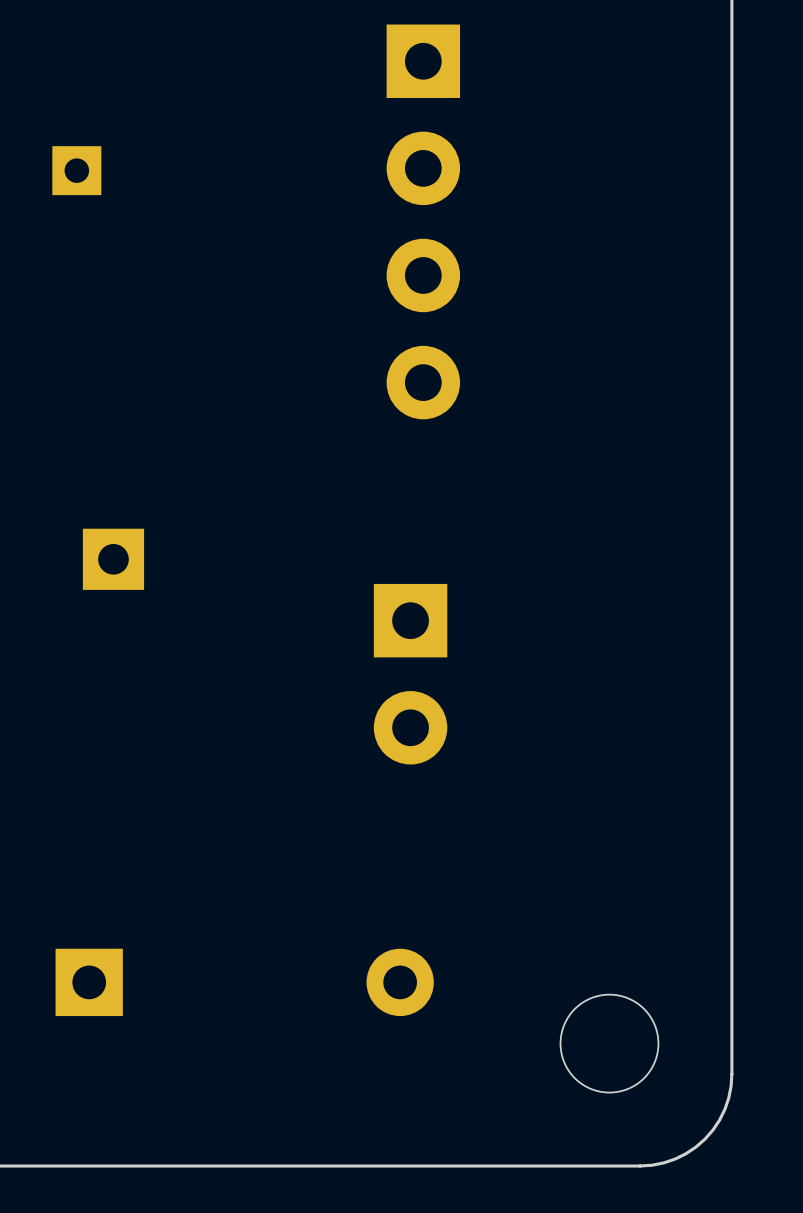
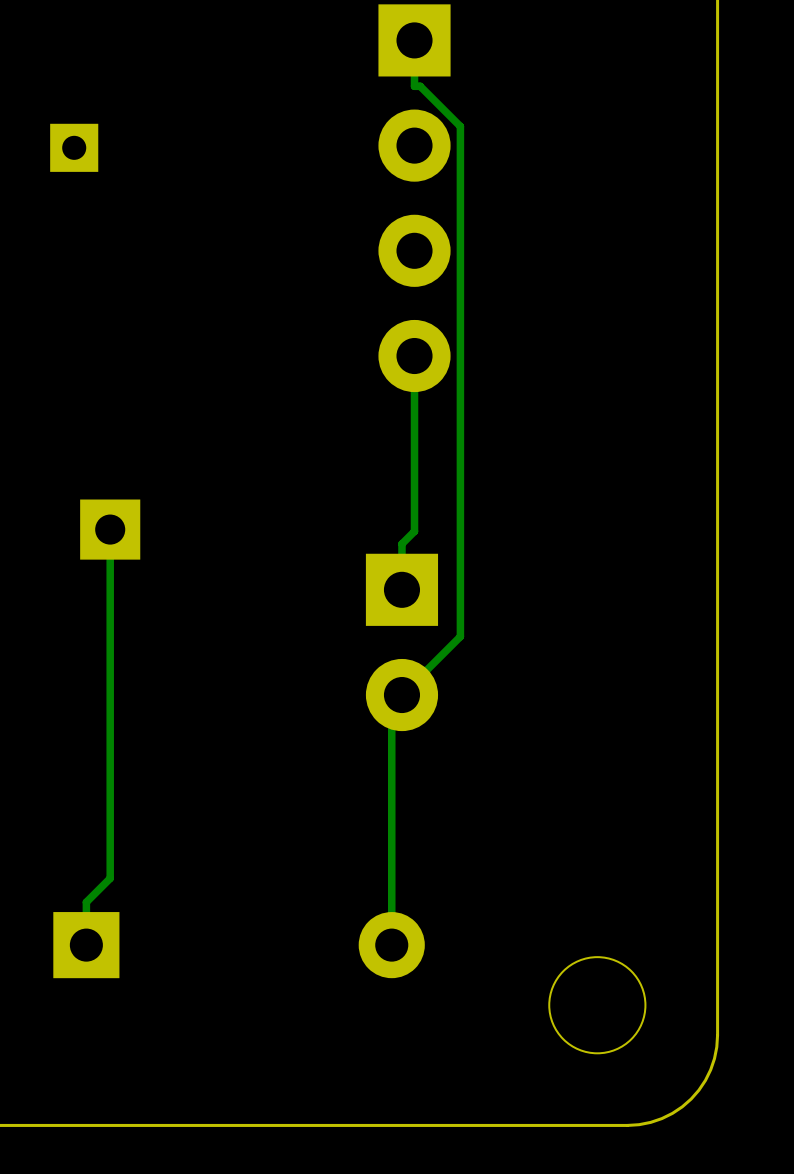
track: none -> (414, 40) (414, 86) (420, 86) (460, 126) (460, 636) (391, 705) (391, 945)
track: none -> (414, 356) (414, 531) (401, 543) (401, 589)
track: none -> (110, 529) (110, 878) (86, 902) (86, 945)

